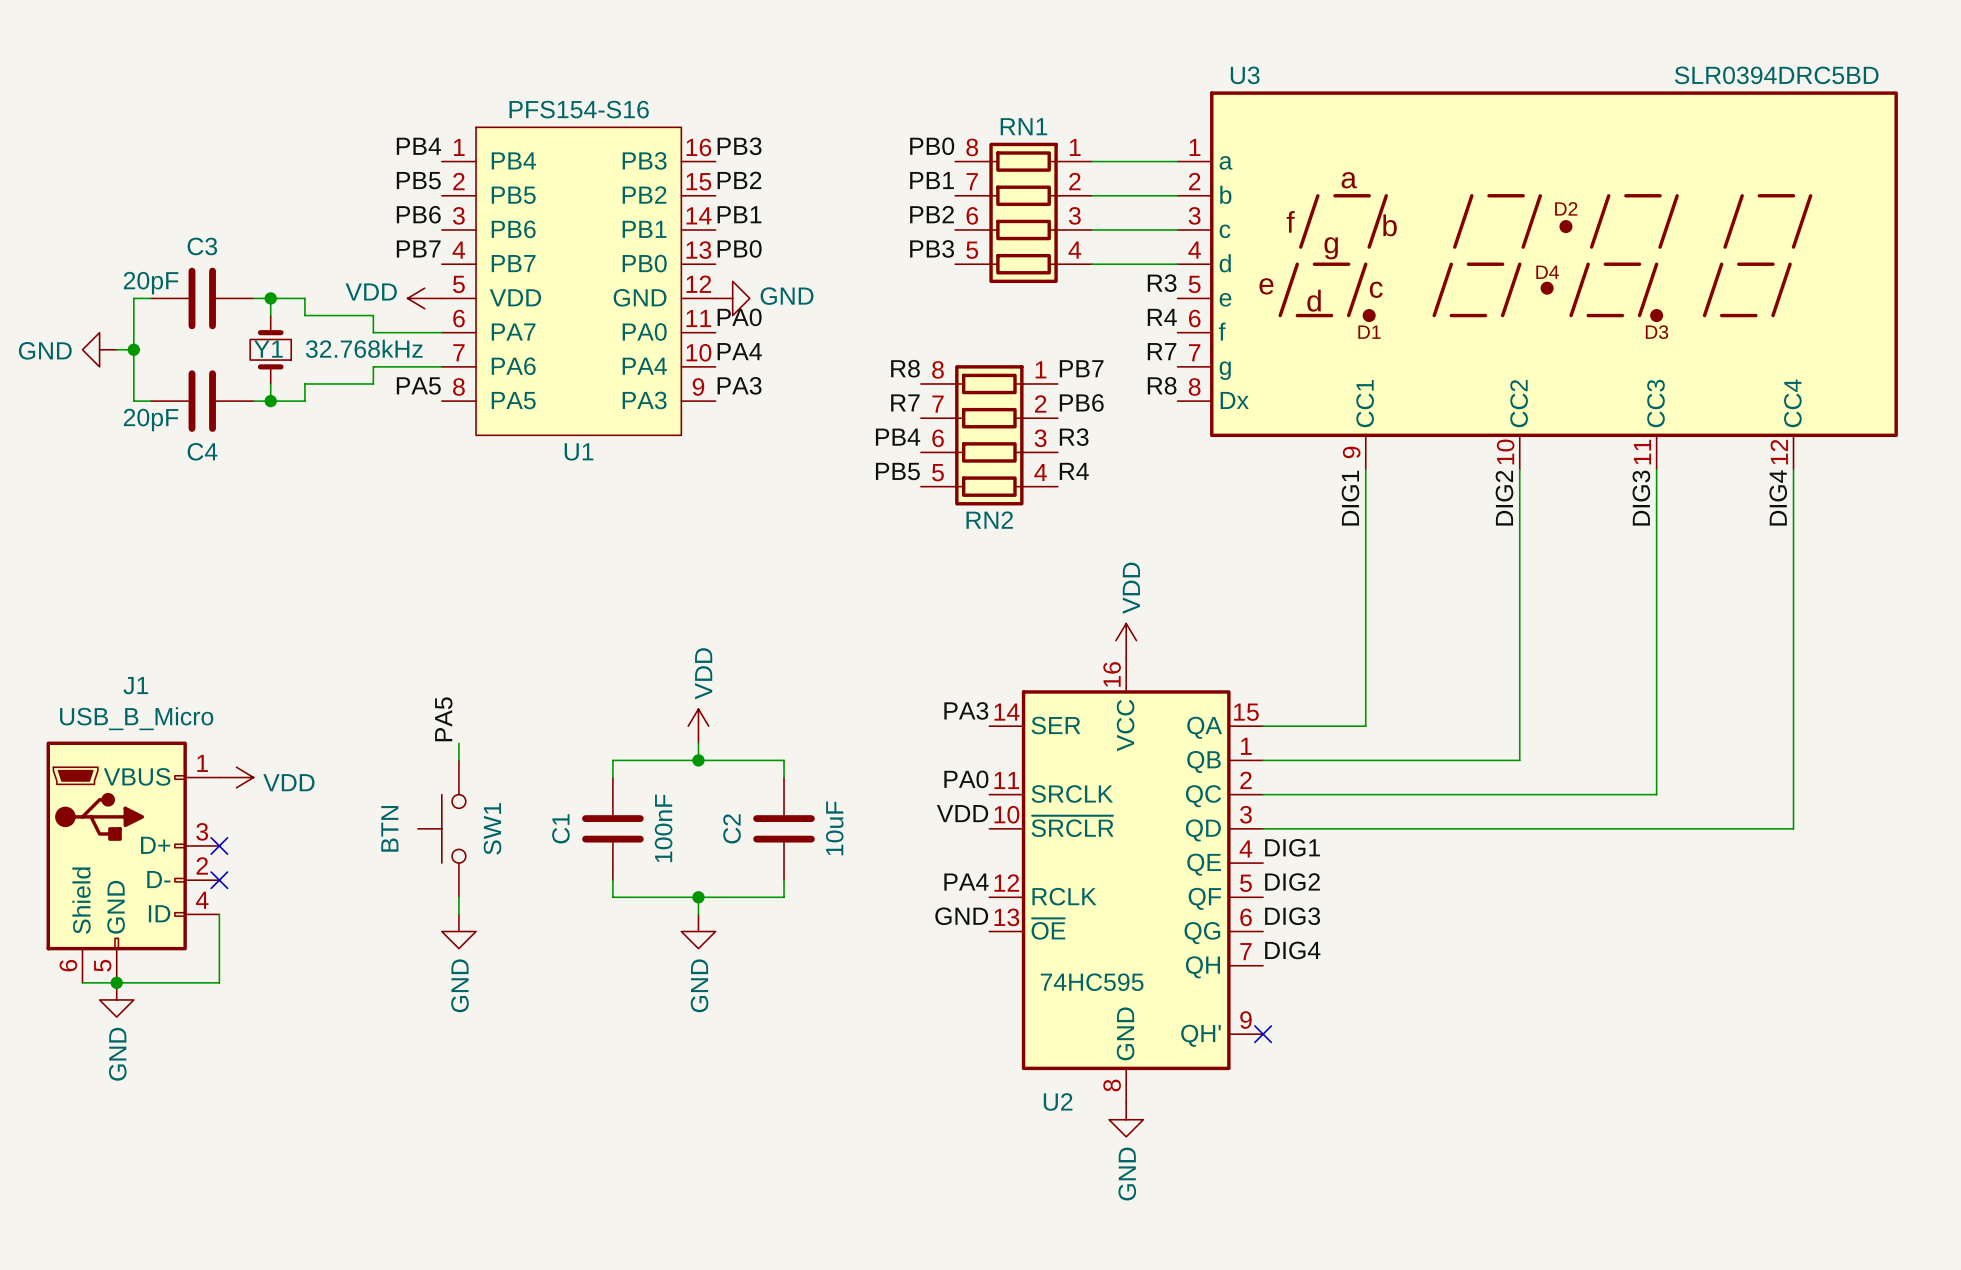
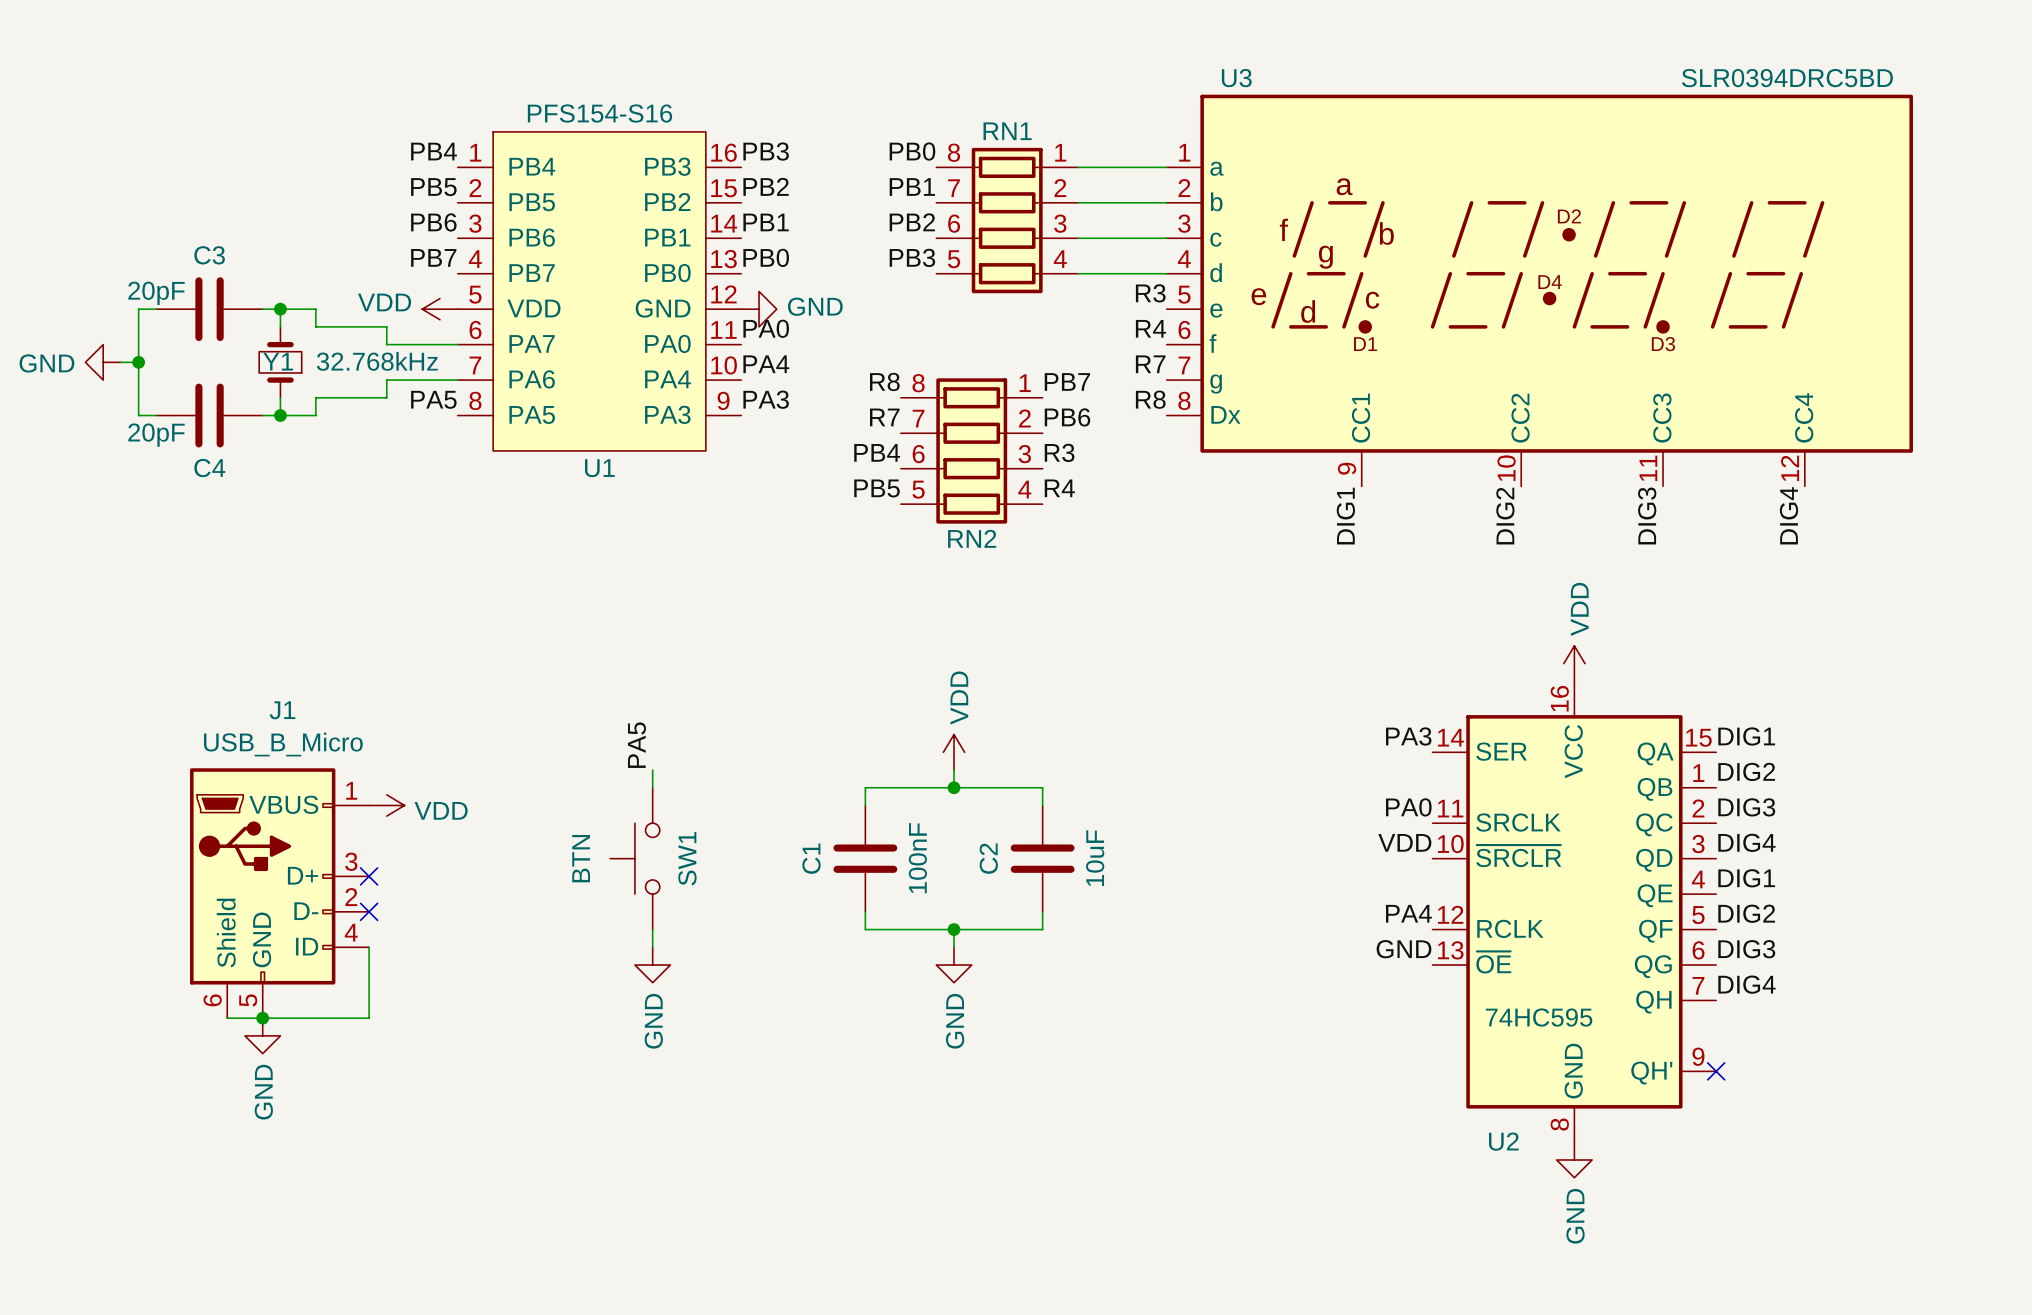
label position: PB0 (932, 146) -> PB0 (912, 151)
label position: PB1 (932, 180) -> PB1 (912, 187)
RN1 position: (1023, 212) -> (1007, 220)
label position: PB2 (932, 214) -> PB2 (912, 222)
label position: PB3 (932, 248) -> PB3 (912, 257)
U3 position: (1537, 280) -> (1539, 290)
label position: R3 (1162, 283) -> R3 (1150, 293)
label position: R4 (1162, 317) -> R4 (1150, 328)
label position: R7 (1162, 351) -> R7 (1150, 364)
label position: R8 (905, 368) -> R8 (884, 381)
label position: PB7 (1081, 368) -> PB7 (1067, 381)
label position: R8 (1162, 385) -> R8 (1150, 399)
label position: R7 (905, 402) -> R7 (884, 417)
label position: PB6 (1081, 402) -> PB6 (1067, 417)
RN2 position: (989, 435) -> (971, 450)
label position: PB4 (898, 437) -> PB4 (877, 452)
label position: R3 (1074, 437) -> R3 (1059, 452)
wire: (1365, 469) (1365, 726) (1263, 726) -> none
wire: (1519, 469) (1519, 760) (1263, 760) -> none
wire: (1656, 469) (1656, 794) (1263, 794) -> none
wire: (1793, 469) (1793, 828) (1263, 828) -> none
label position: PB5 (897, 471) -> PB5 (877, 488)
label position: R4 (1074, 471) -> R4 (1059, 488)
label position: DIG4 (1778, 497) -> DIG4 (1789, 515)
label position: DIG1 (1350, 498) -> DIG1 (1345, 516)
label position: DIG2 (1504, 498) -> DIG2 (1505, 516)
label position: DIG3 (1641, 498) -> DIG3 (1647, 516)
power symbol: VDD (1126, 640) -> none
power symbol: none -> VDD (1574, 663)
label: PA3 (966, 710) -> none
label: none -> PA3 (1408, 736)
label: none -> DIG1 (1746, 736)
label position: PA5 (443, 719) -> PA5 (636, 745)
power symbol: VDD (698, 726) -> none
power symbol: none -> VDD (954, 752)
wire: (458, 743) (458, 760) -> (652, 770) (652, 787)
wire: (698, 743) (698, 760) -> (954, 770) (954, 787)
label: none -> DIG2 (1746, 771)
junction: (698, 760) -> none
junction: none -> (954, 787)
power symbol position: VDD (236, 777) -> VDD (386, 805)
wire: (612, 777) (612, 760) (784, 760) (784, 777) -> (865, 805) (865, 787) (1042, 787) (1042, 805)
label: PA0 (966, 779) -> none
label: none -> PA0 (1408, 807)
label: none -> DIG3 (1746, 807)
label: VDD (962, 813) -> none
label: none -> VDD (1404, 842)
label: none -> DIG4 (1746, 842)
SW1 position: (441, 828) -> (634, 858)
C1 position: (612, 828) -> (865, 858)
C2 position: (784, 828) -> (1042, 858)
no-connect mark: (219, 845) -> none
no-connect mark: none -> (369, 876)
label: DIG1 (1292, 847) -> none
label: none -> DIG1 (1746, 878)
J1 position: (132, 862) -> (279, 893)
no-connect mark: (219, 880) -> none
no-connect mark: none -> (369, 911)
wire: (612, 880) (612, 897) (784, 897) (784, 880) -> (865, 911) (865, 929) (1042, 929) (1042, 911)
U2 position: (1126, 880) -> (1574, 911)
label: PA4 (966, 882) -> none
label: DIG2 (1292, 882) -> none
label: none -> PA4 (1408, 913)
label: none -> DIG2 (1746, 913)
wire: (458, 897) (458, 914) -> (652, 929) (652, 947)
wire: (698, 897) (698, 914) -> (954, 929) (954, 947)
junction: (698, 897) -> none
junction: none -> (954, 929)
wire: (219, 914) (219, 982) (82, 982) -> (369, 947) (369, 1018) (227, 1018)
label: GND (961, 916) -> none
label: DIG3 (1292, 916) -> none
label: none -> GND (1404, 949)
label: none -> DIG3 (1746, 949)
power symbol: GND (458, 931) -> none
power symbol position: GND (698, 931) -> GND (652, 965)
power symbol: none -> GND (954, 965)
label: DIG4 (1292, 950) -> none
label: none -> DIG4 (1746, 984)
junction: (116, 982) -> none
junction: none -> (262, 1018)
power symbol: GND (116, 999) -> none
power symbol: none -> GND (262, 1035)
no-connect mark: (1263, 1034) -> none
no-connect mark: none -> (1716, 1071)
power symbol: GND (1126, 1119) -> none
power symbol: none -> GND (1574, 1159)

